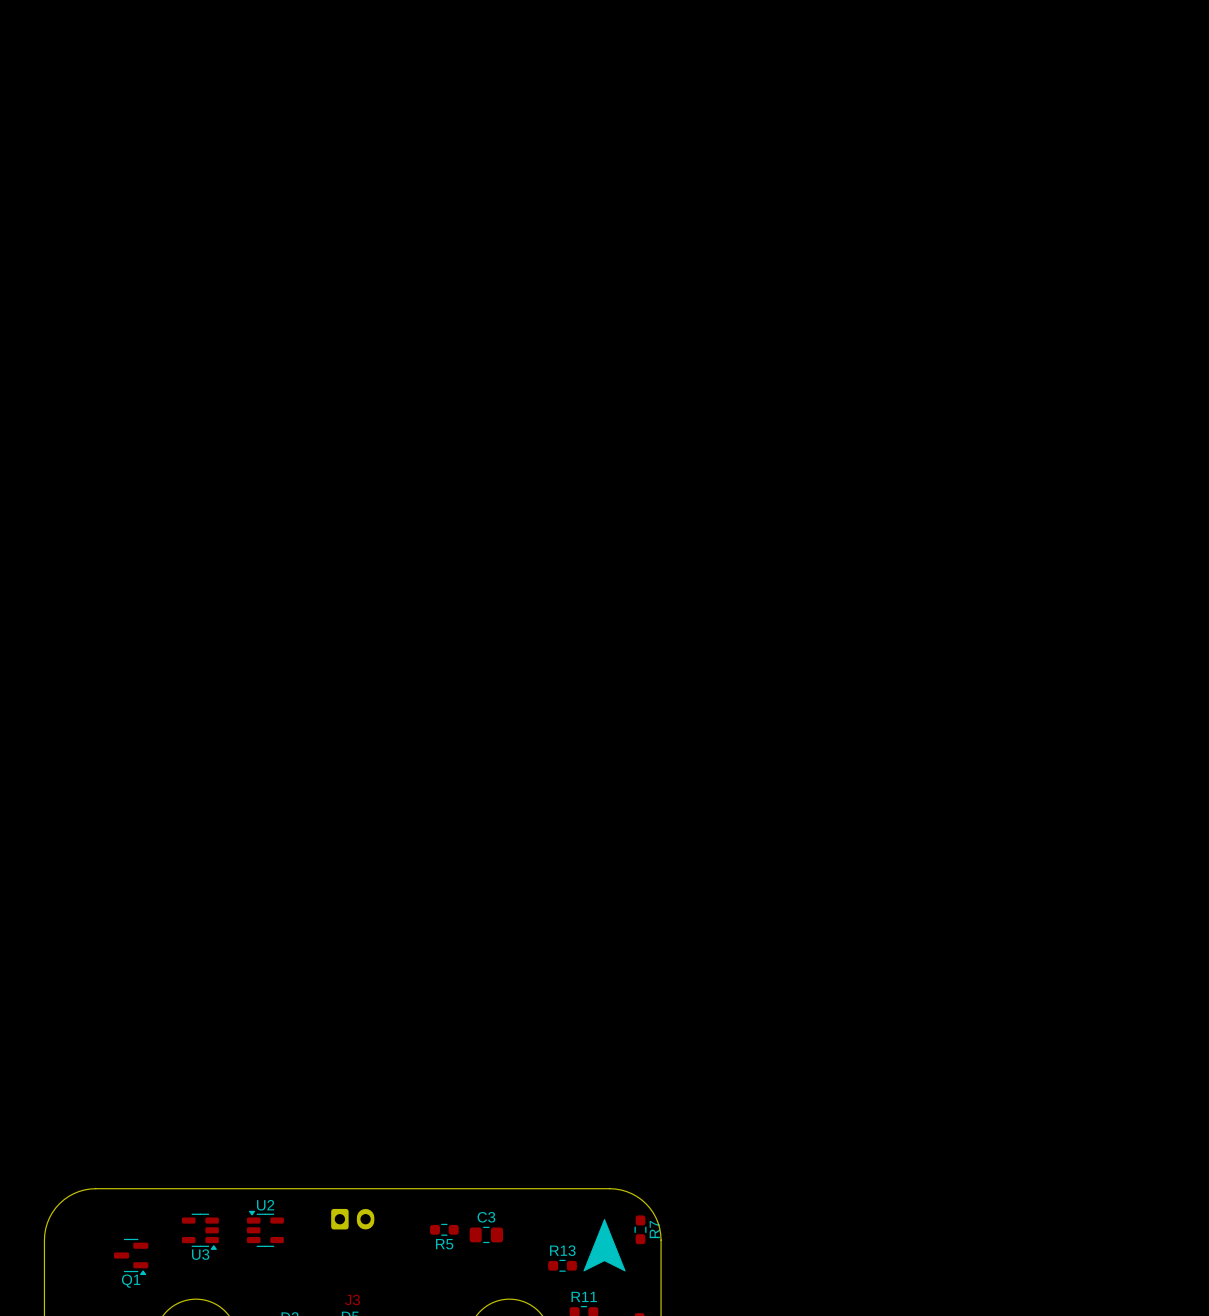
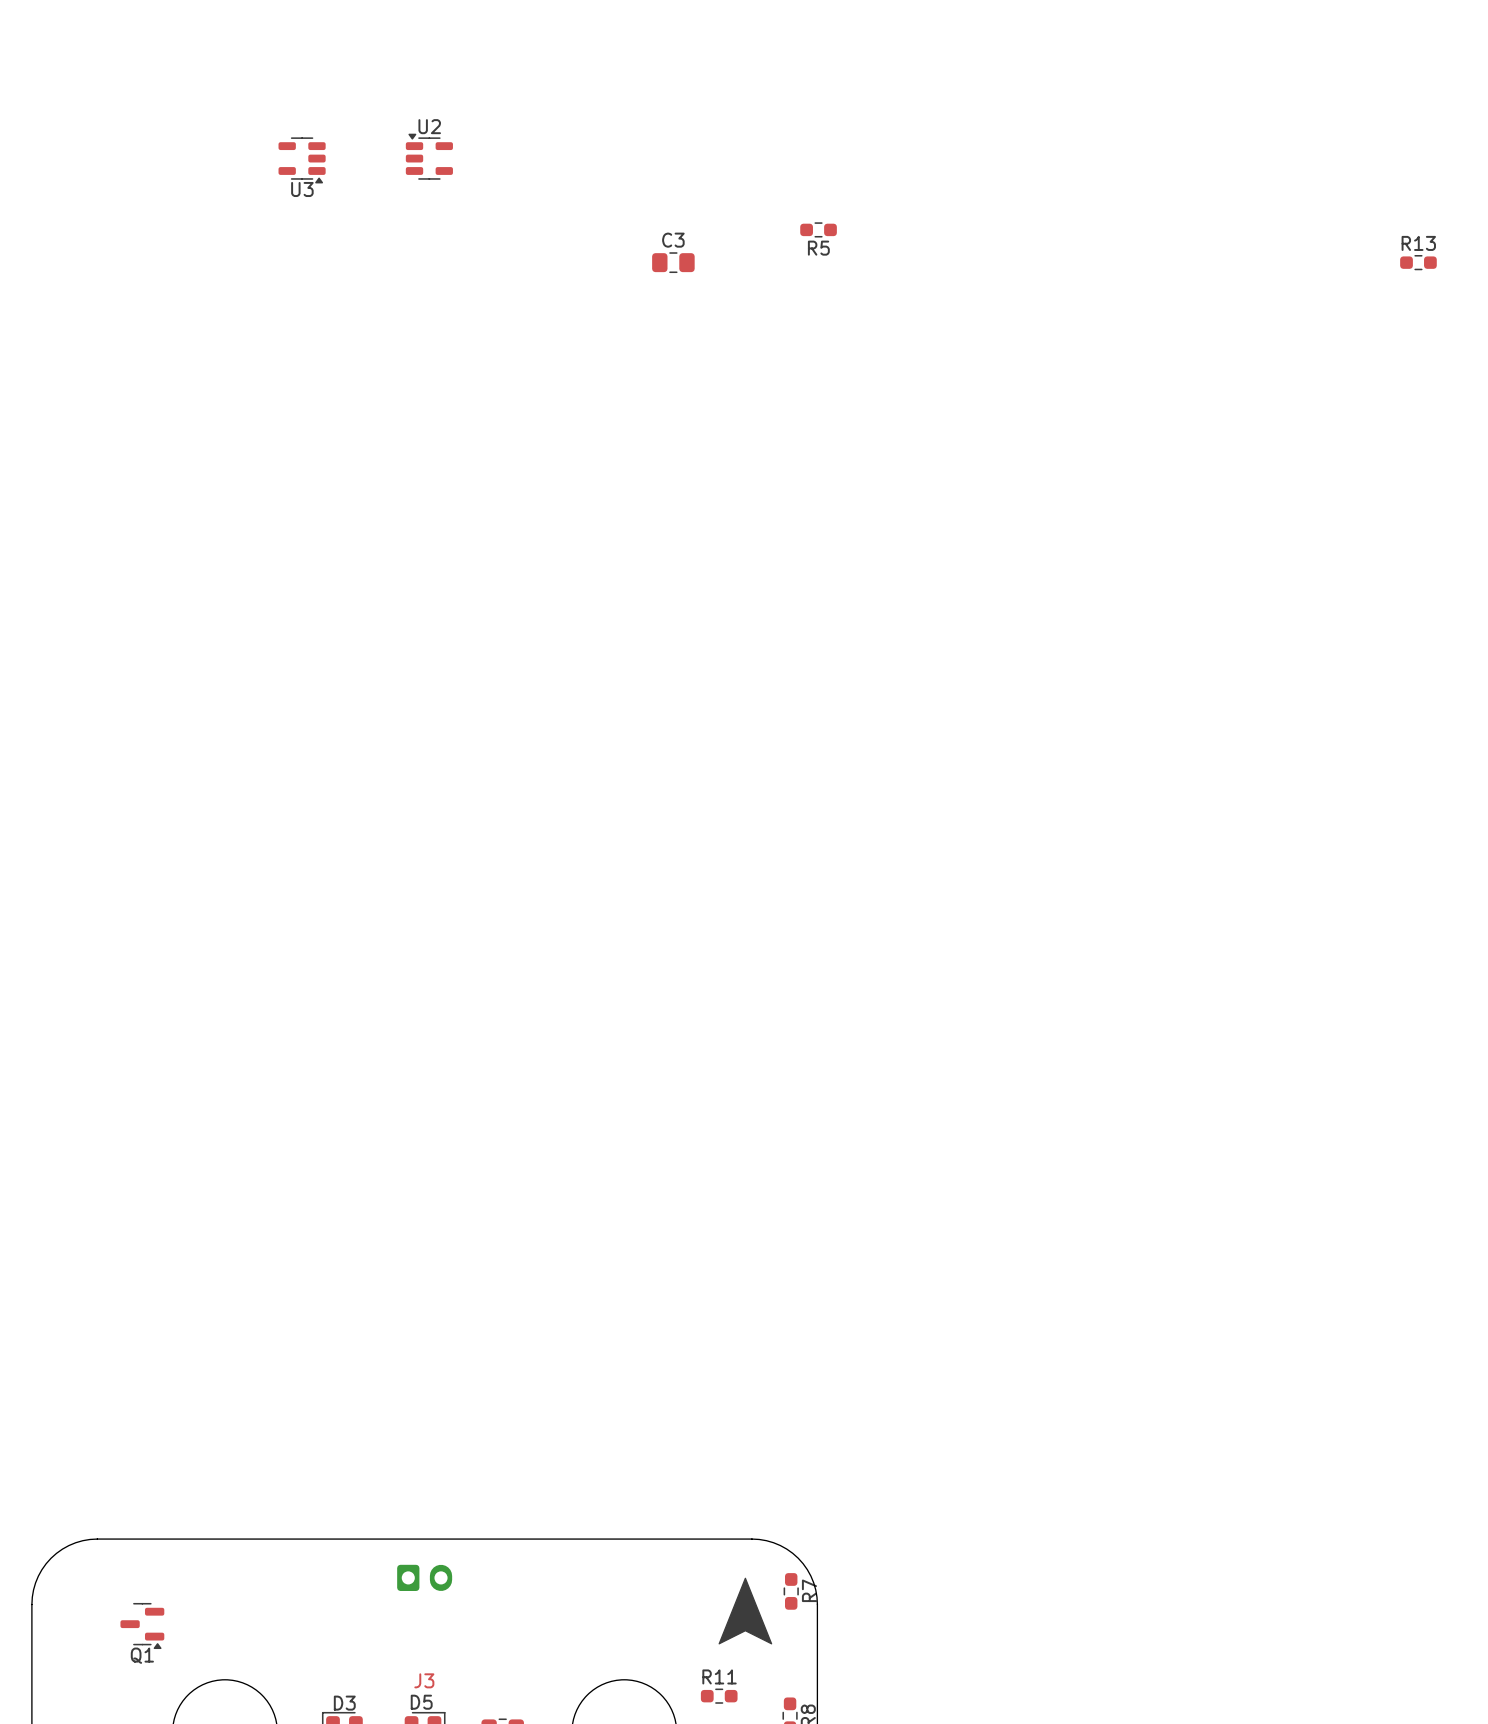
U2 position: (265, 1228) -> (429, 156)
R5 position: (444, 1229) -> (818, 229)
U3 position: (200, 1231) -> (302, 160)
C3 position: (486, 1234) -> (673, 262)
R13 position: (562, 1265) -> (1418, 262)

